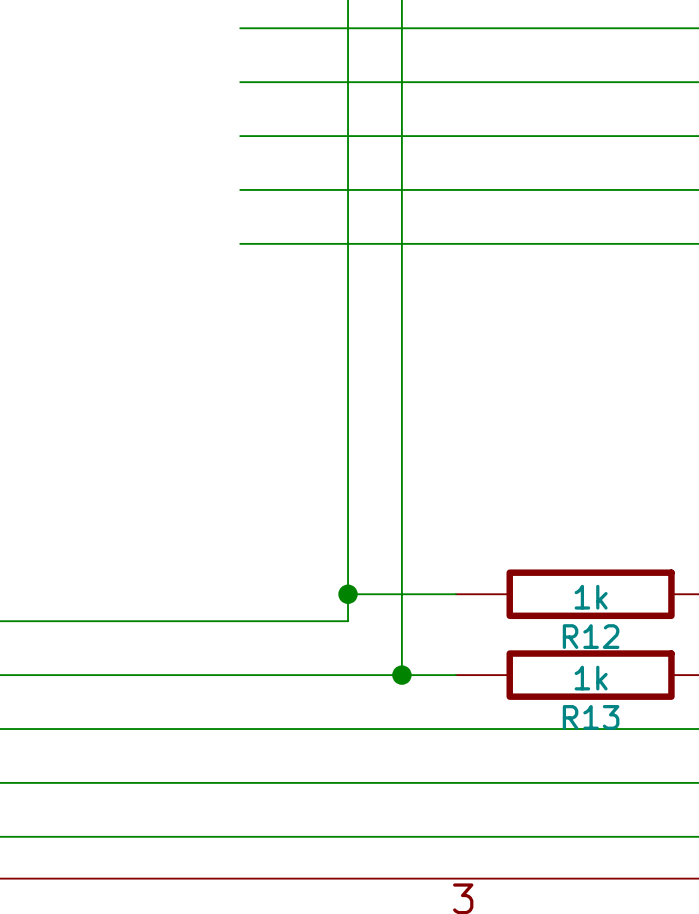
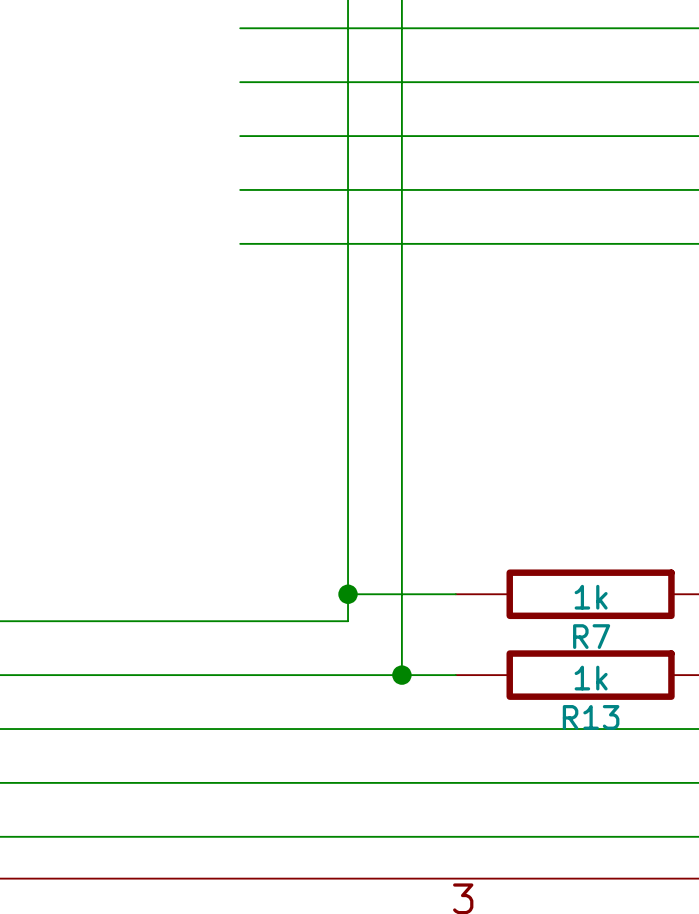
R12 name: R12 (591, 636) -> R7 (591, 636)

